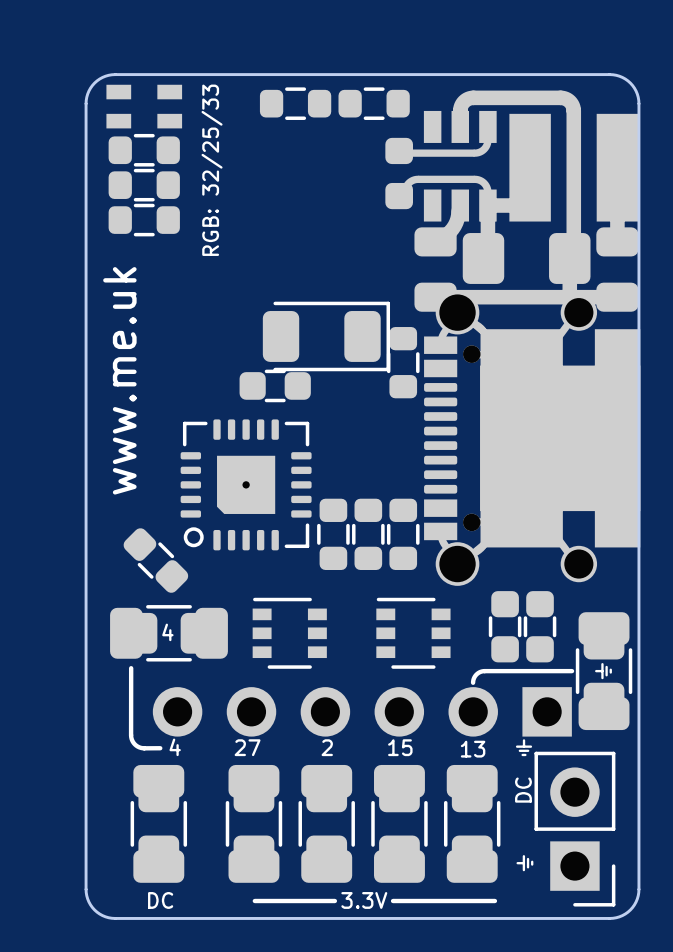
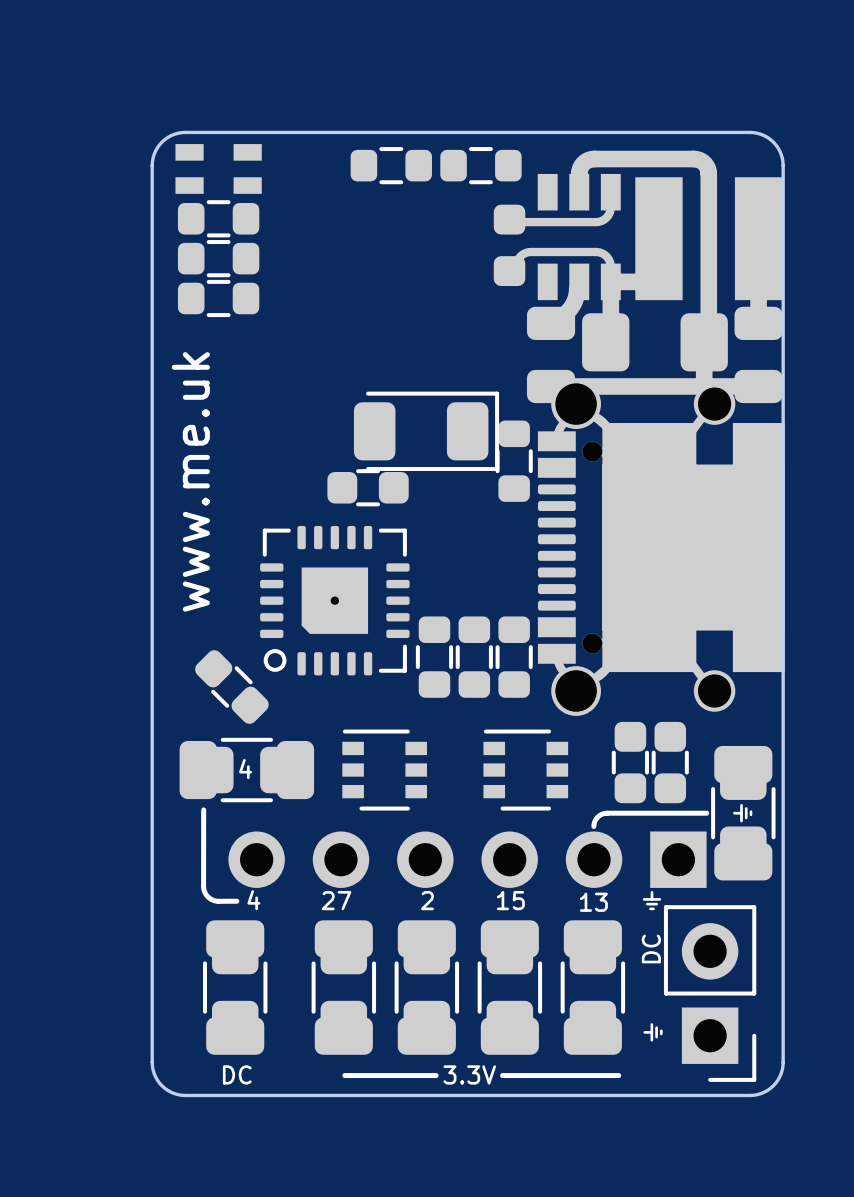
text: RGB: 32/25/33 (212, 170) -> none

